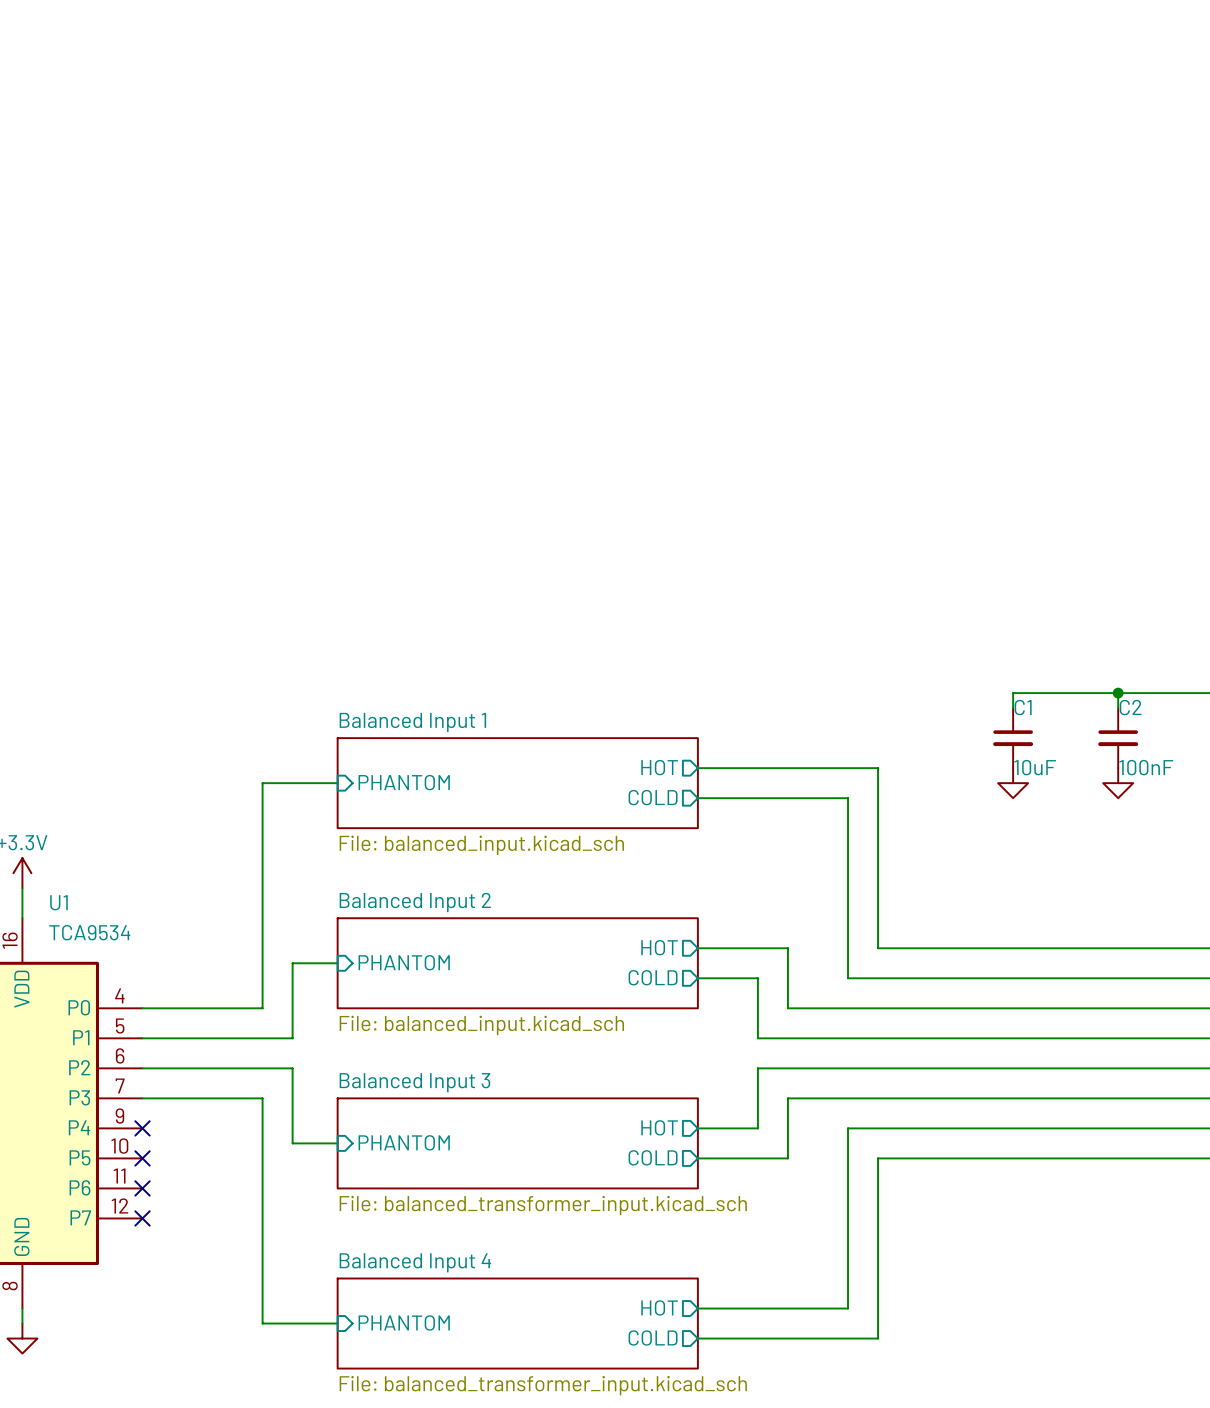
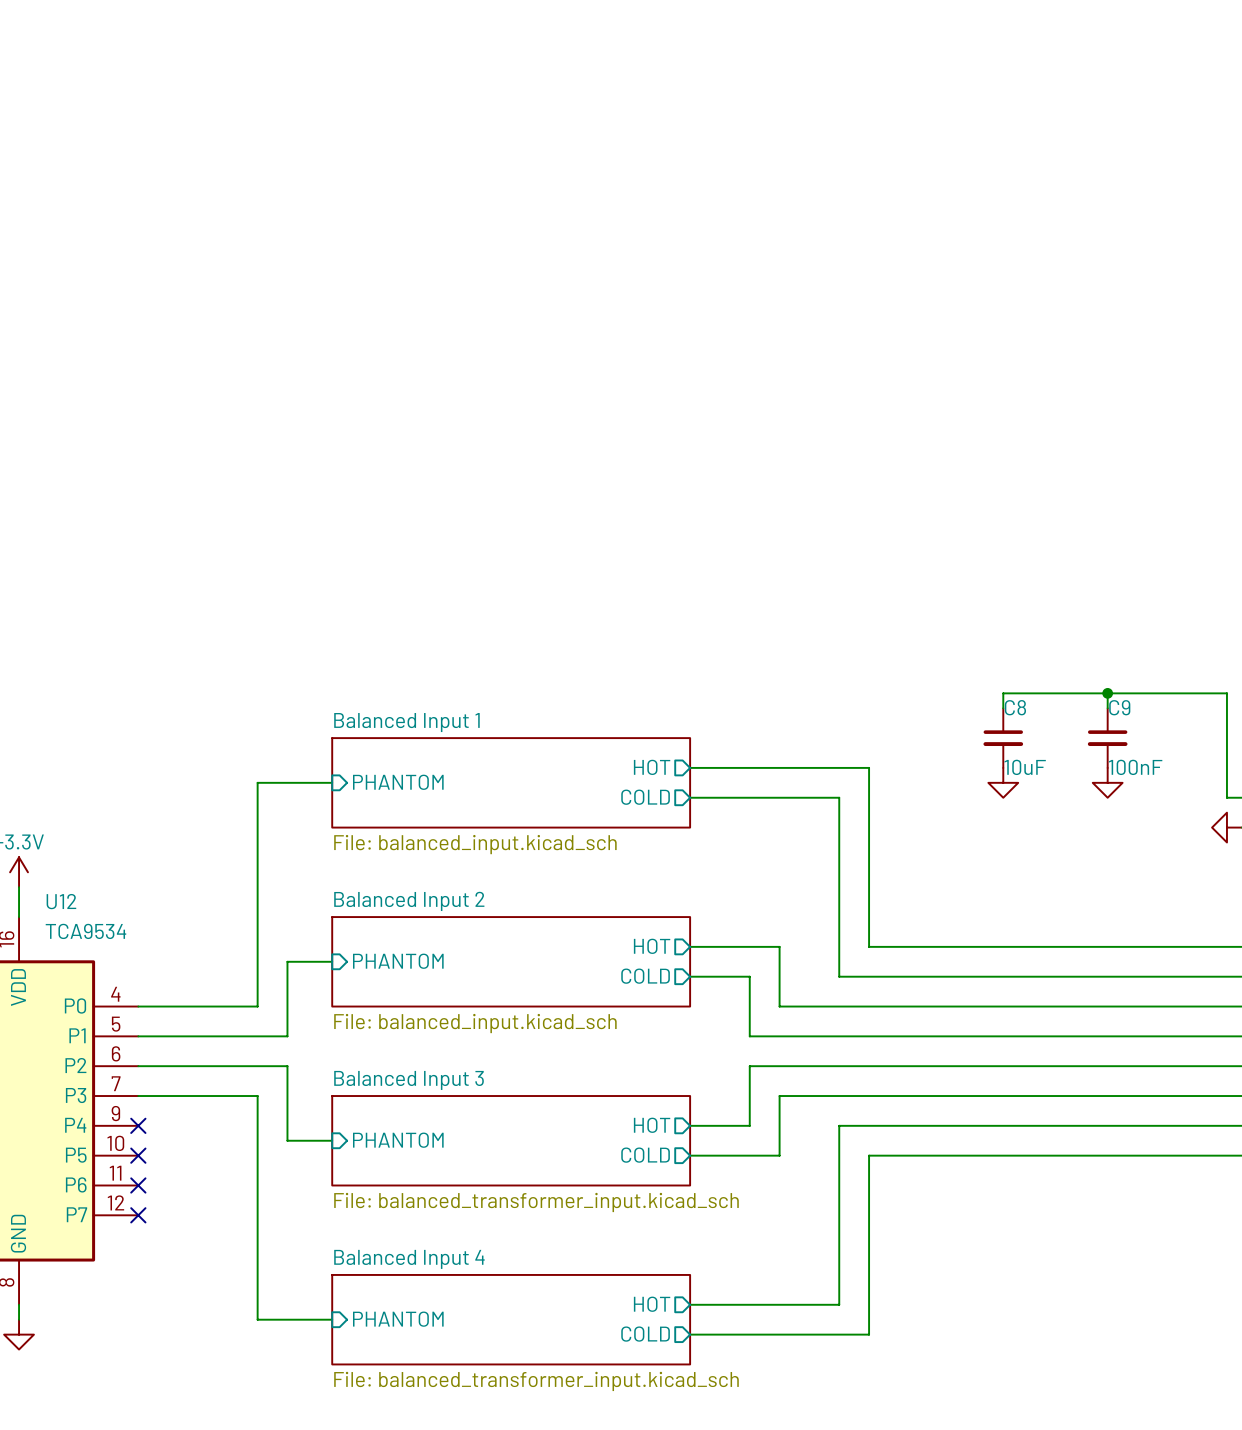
C1 name: C1 (1023, 707) -> C8 (1015, 707)
C2 name: C2 (1130, 707) -> C9 (1119, 707)
U1 name: U1 (58, 902) -> U12 (61, 901)

